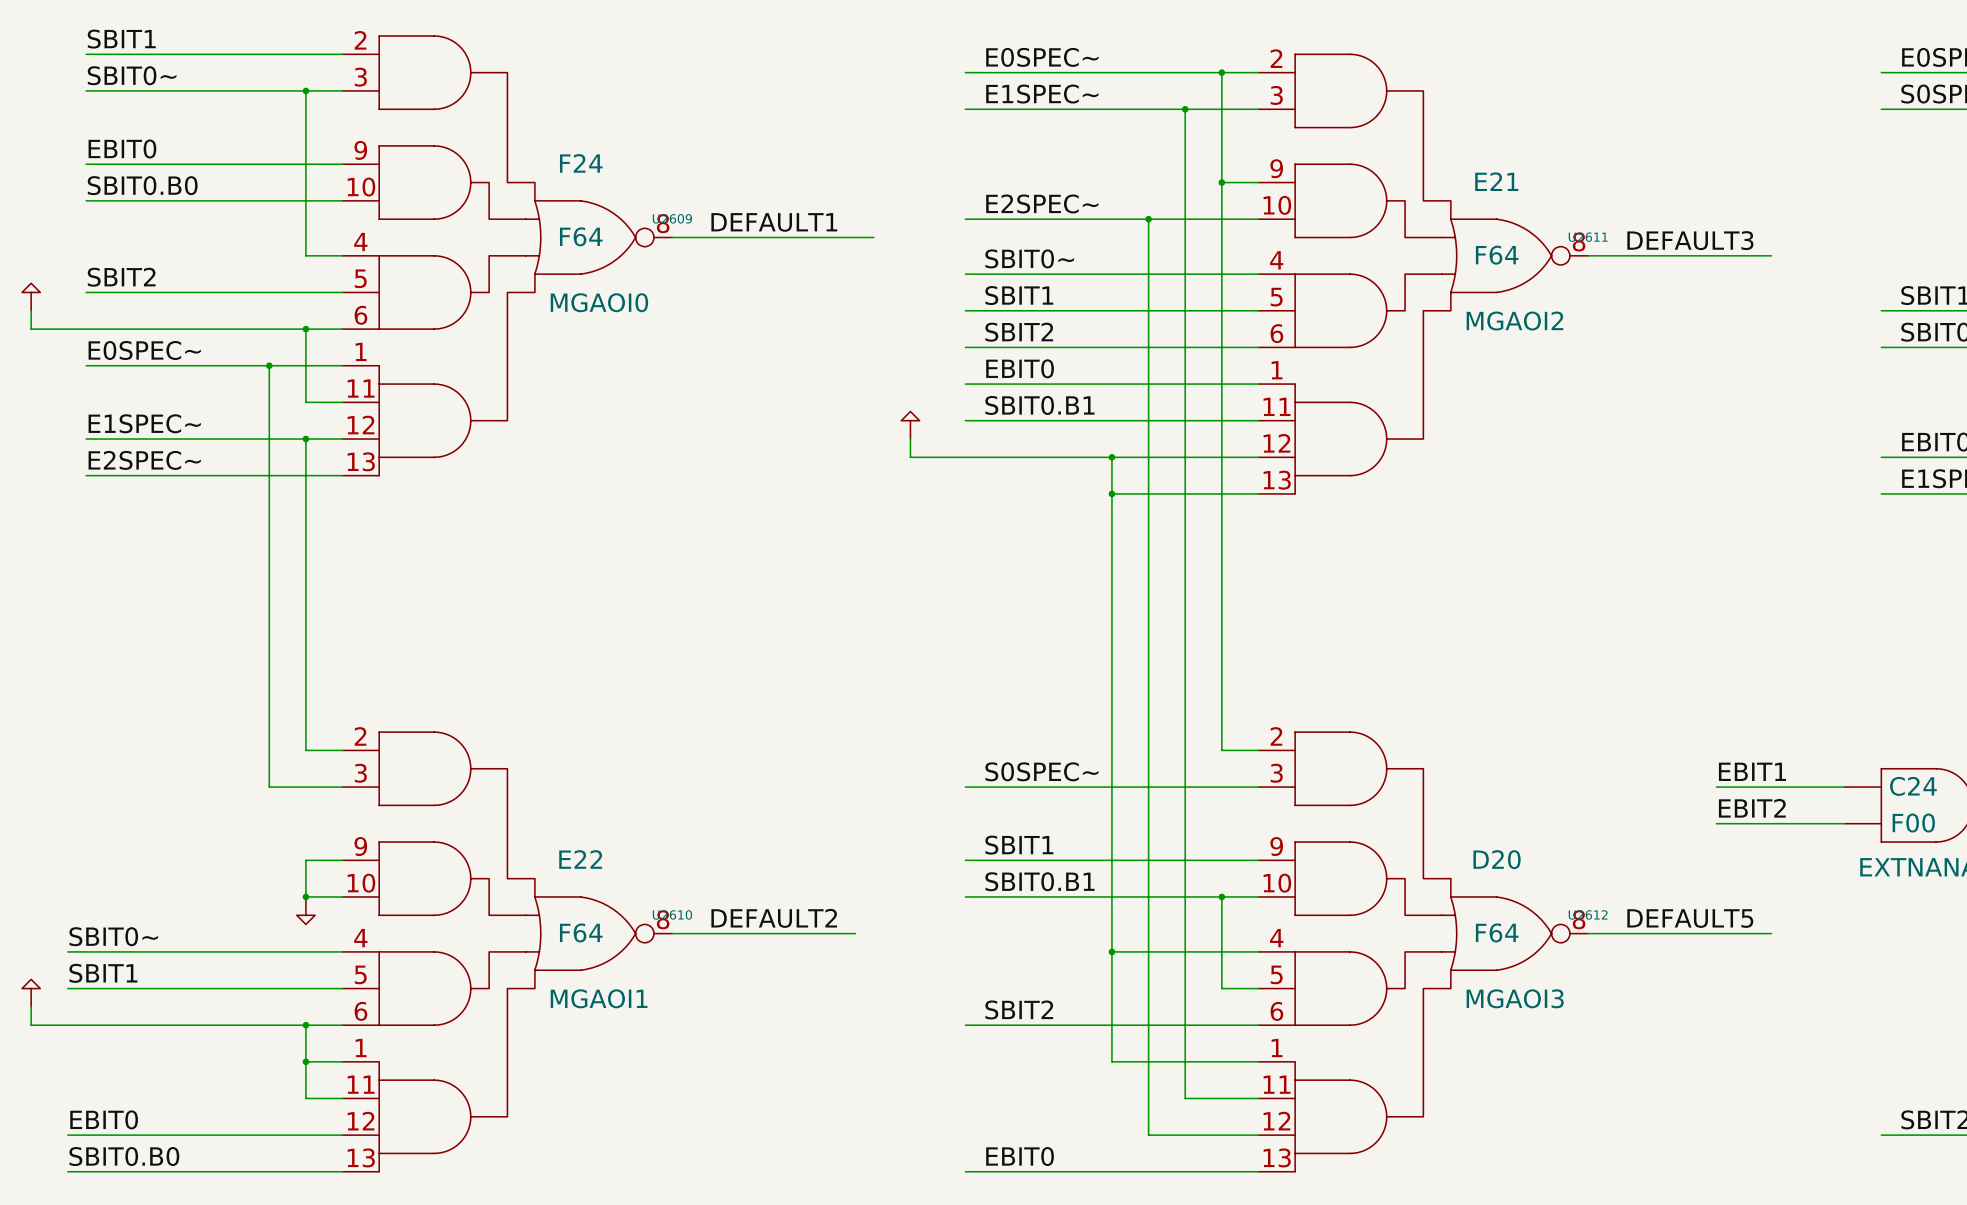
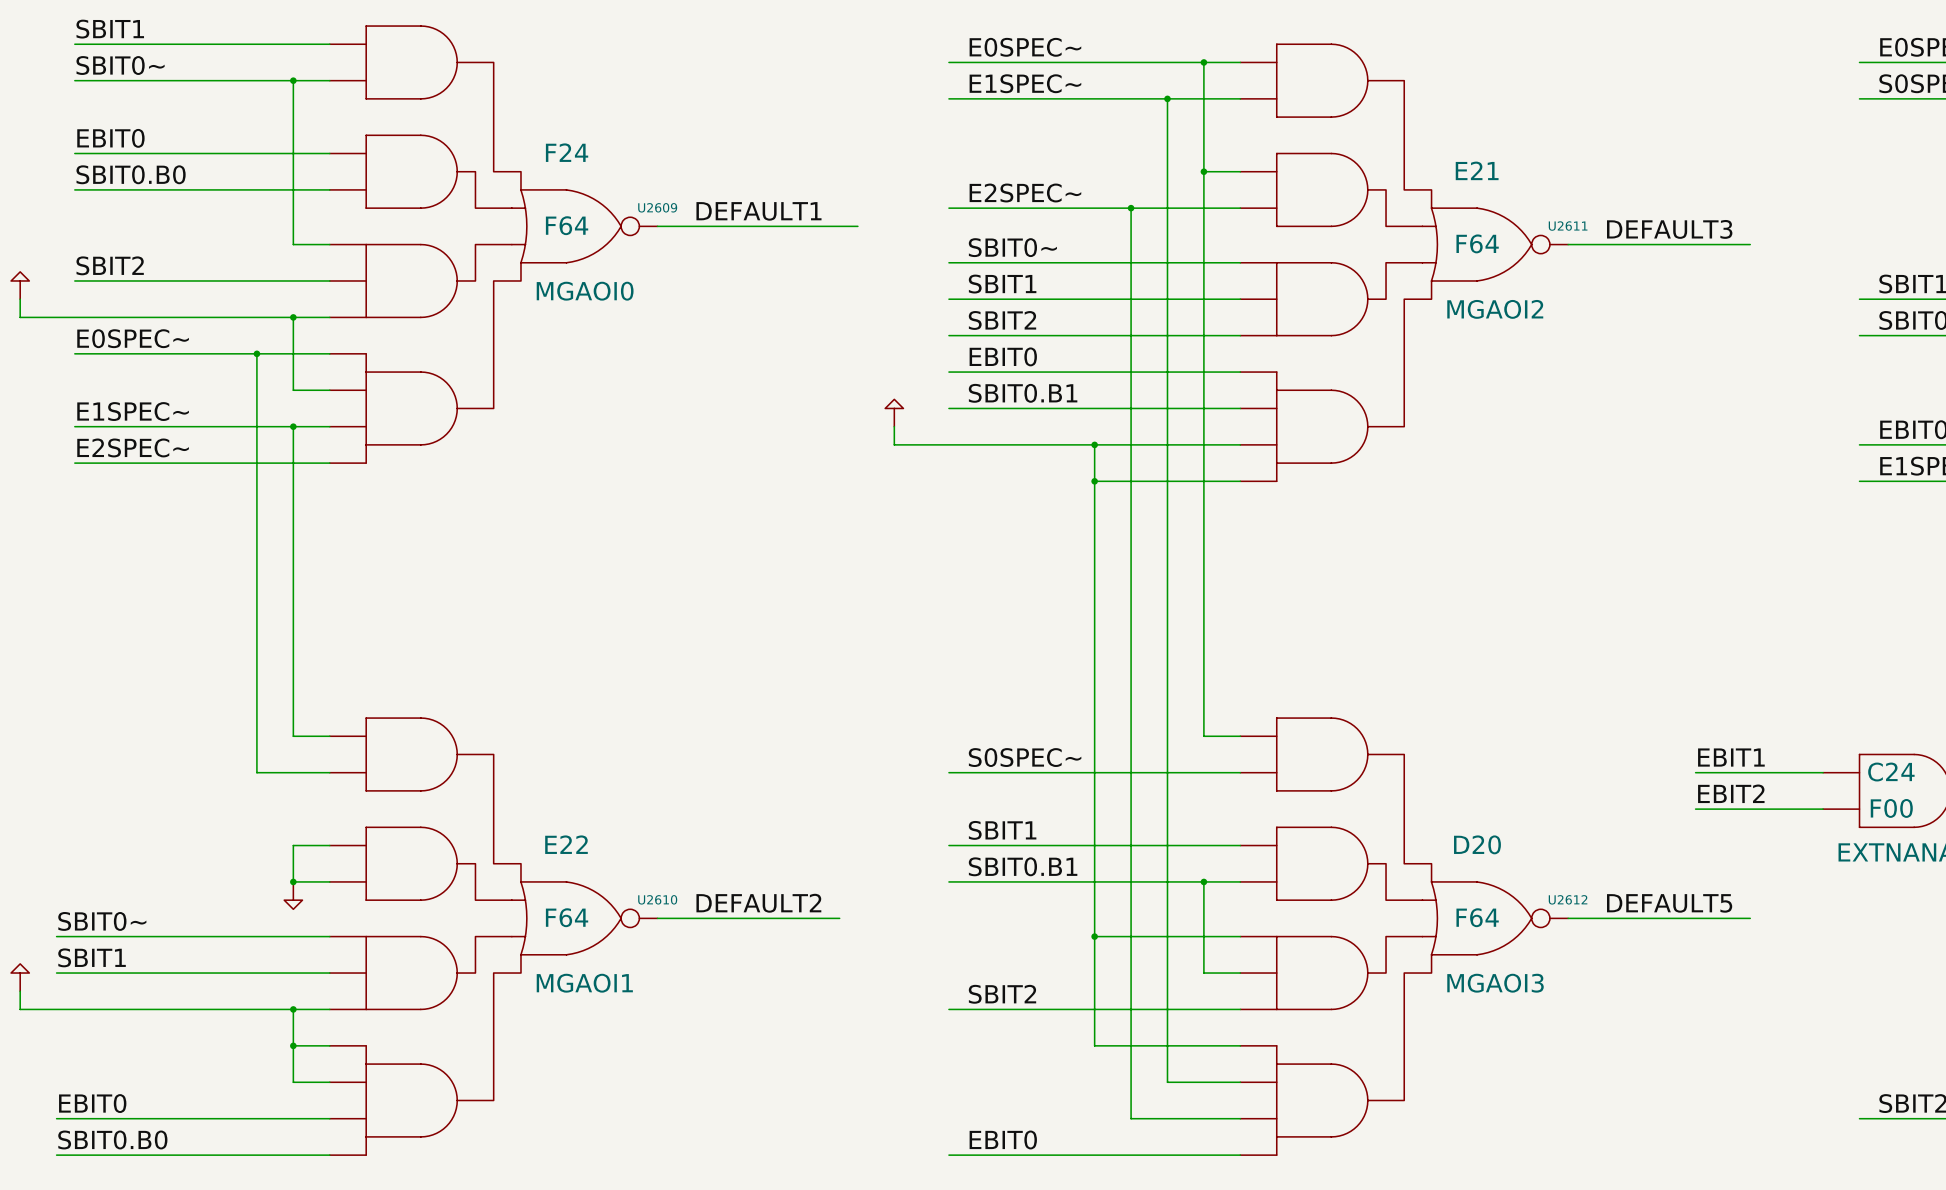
U2609 symbol: [342, 35, 673, 477] -> [329, 25, 658, 464]
U2611 symbol: [1258, 53, 1589, 495] -> [1240, 43, 1569, 482]
U2610 symbol: [342, 731, 673, 1173] -> [329, 717, 658, 1156]
U2612 symbol: [1258, 731, 1589, 1173] -> [1240, 717, 1569, 1156]

